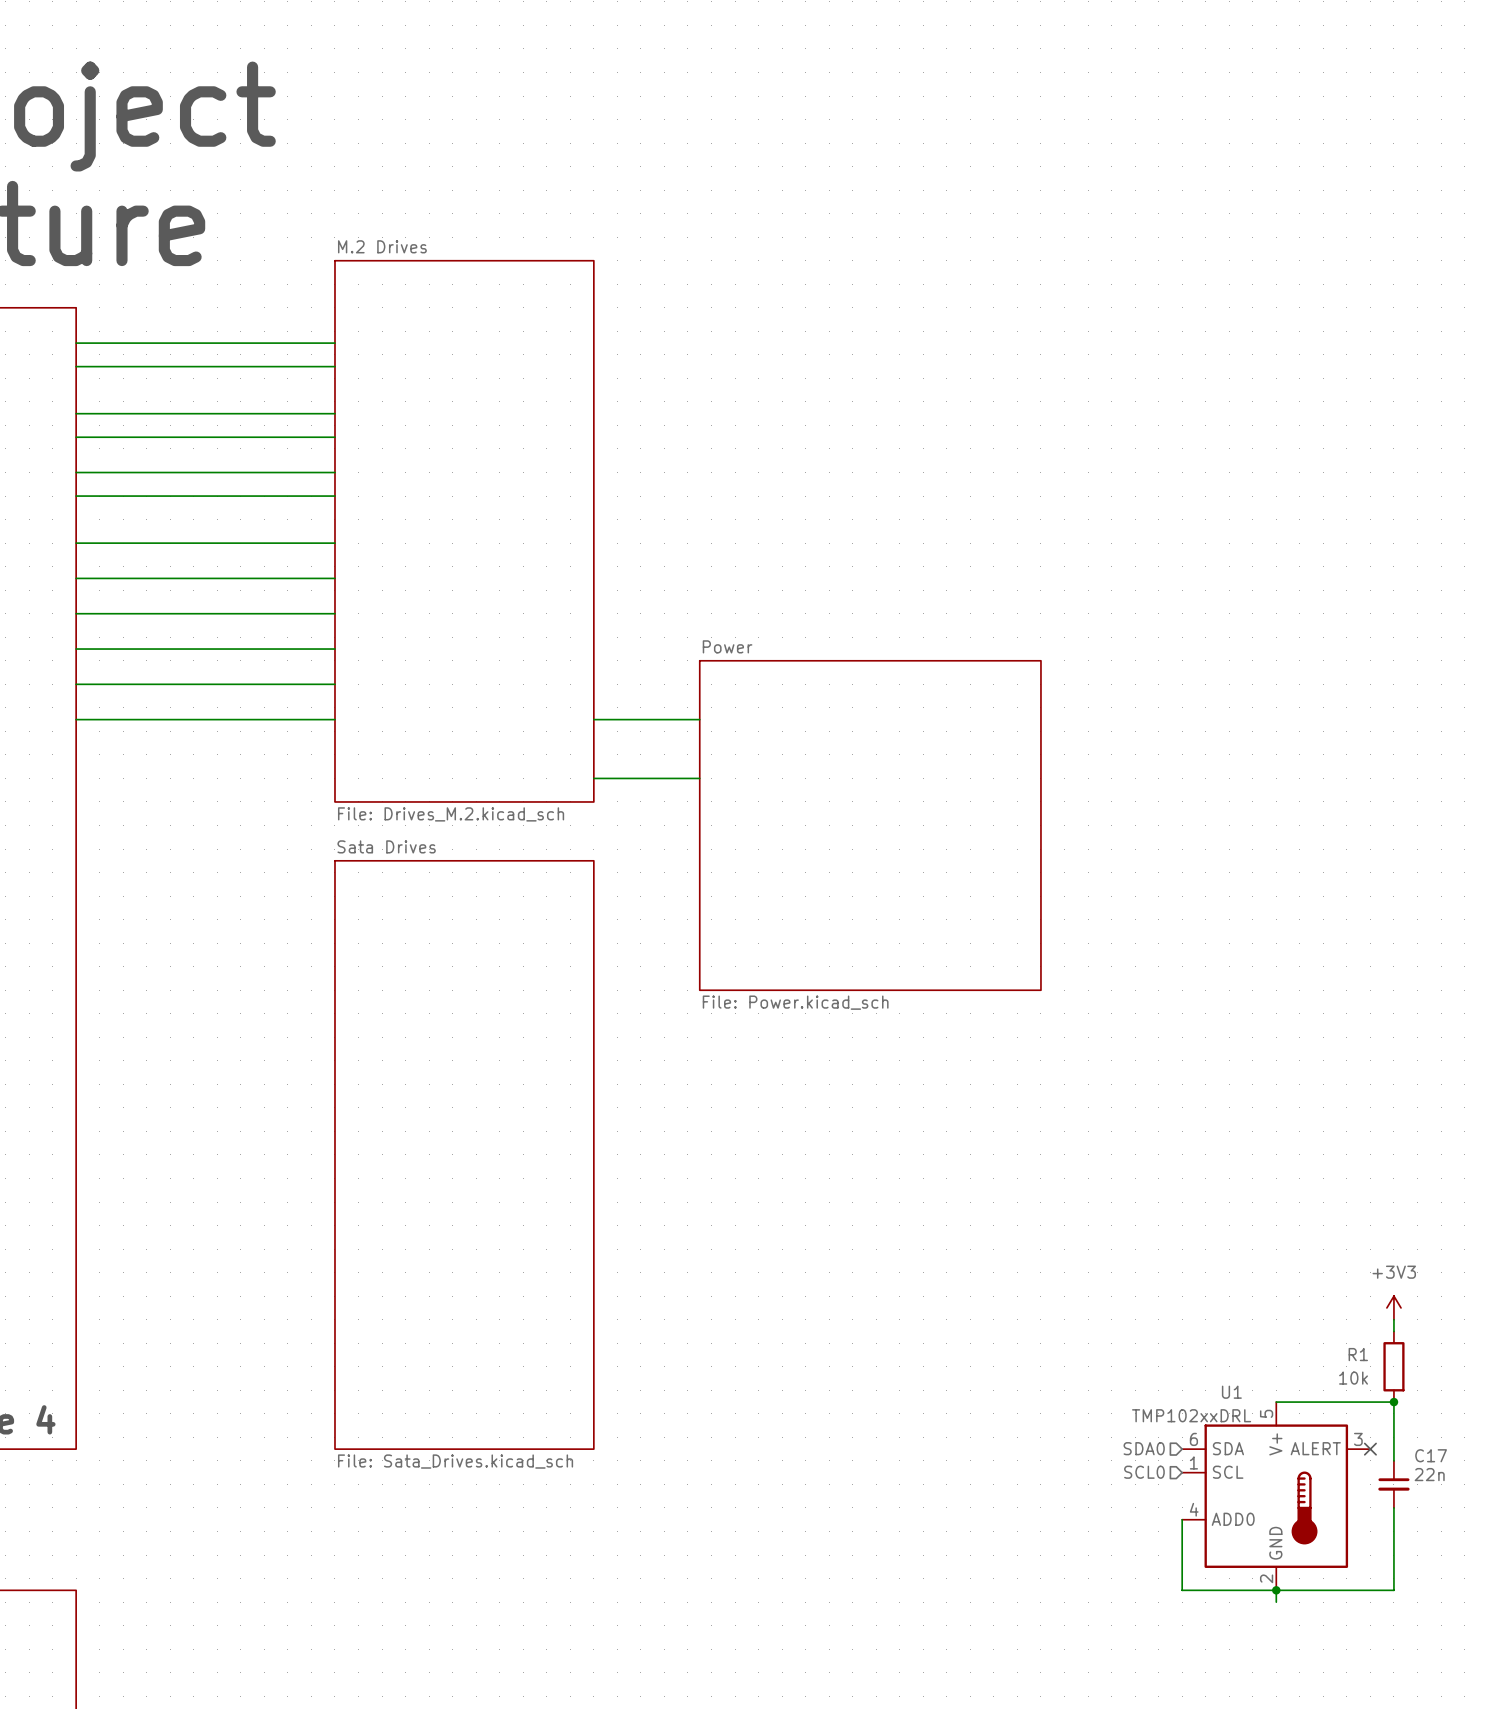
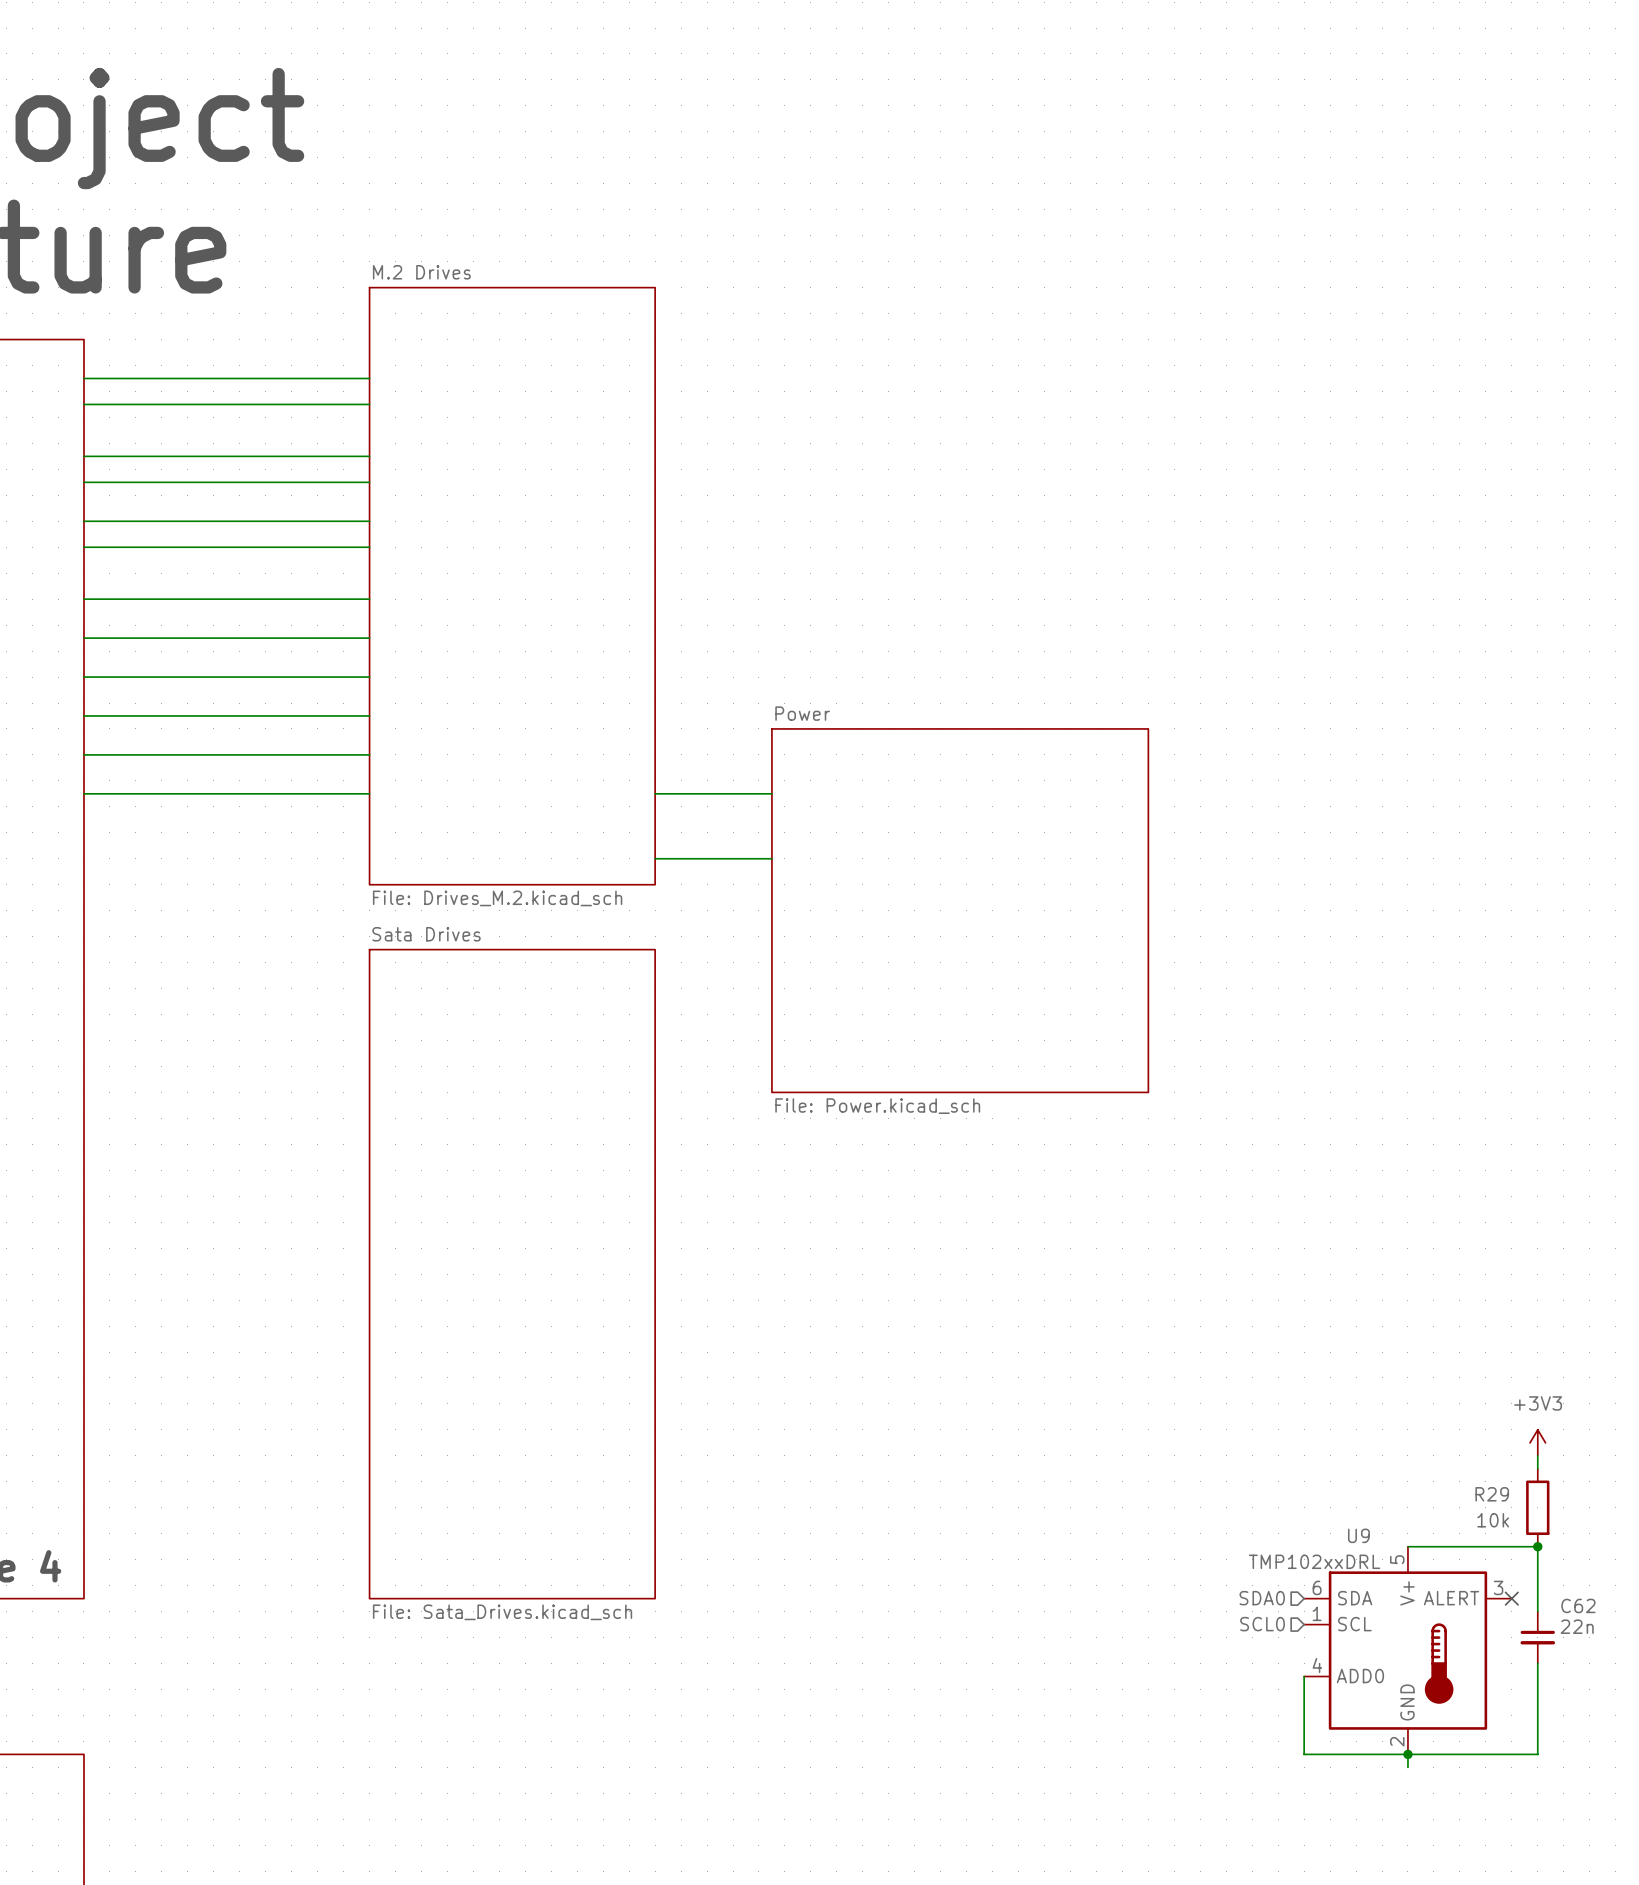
R1 name: R1 (1358, 1354) -> R29 (1492, 1494)
U1 name: U1 (1231, 1392) -> U9 (1358, 1535)
C17 name: C17 (1431, 1455) -> C62 (1578, 1605)

